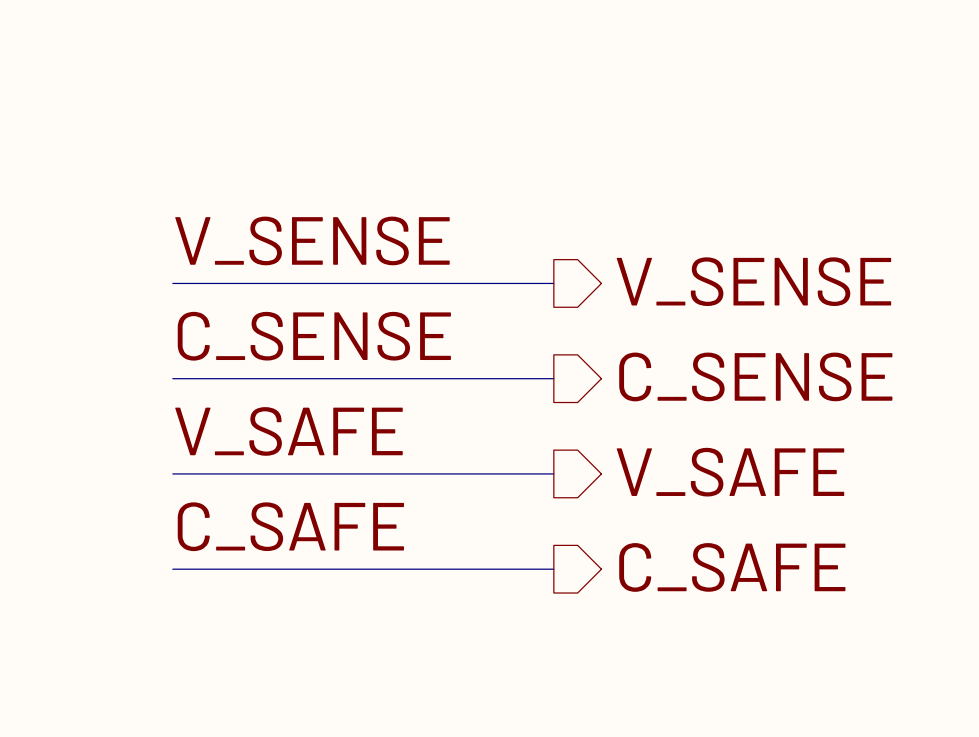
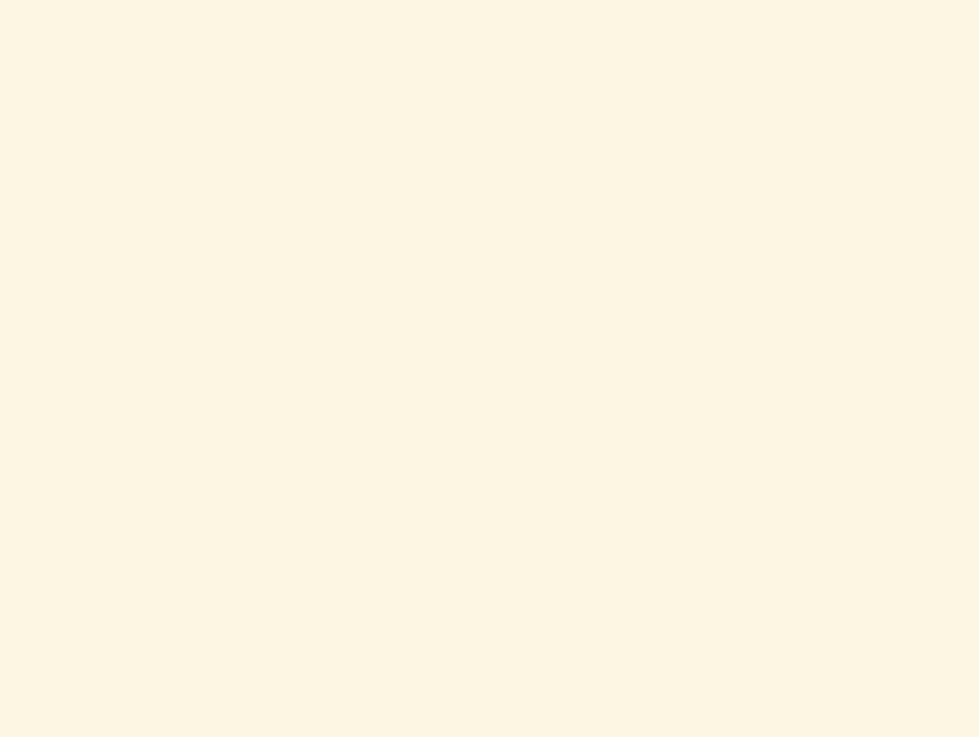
label: V_SENSE (312, 240) -> none
hierarchical label: V_SENSE (753, 281) -> none
wire: (172, 283) (553, 283) -> none
label: C_SENSE (314, 336) -> none
hierarchical label: C_SENSE (755, 376) -> none
wire: (172, 378) (553, 378) -> none
label: V_SAFE (288, 431) -> none
hierarchical label: V_SAFE (730, 472) -> none
wire: (172, 473) (553, 473) -> none
label: C_SAFE (290, 526) -> none
hierarchical label: C_SAFE (732, 567) -> none
wire: (172, 569) (553, 569) -> none

